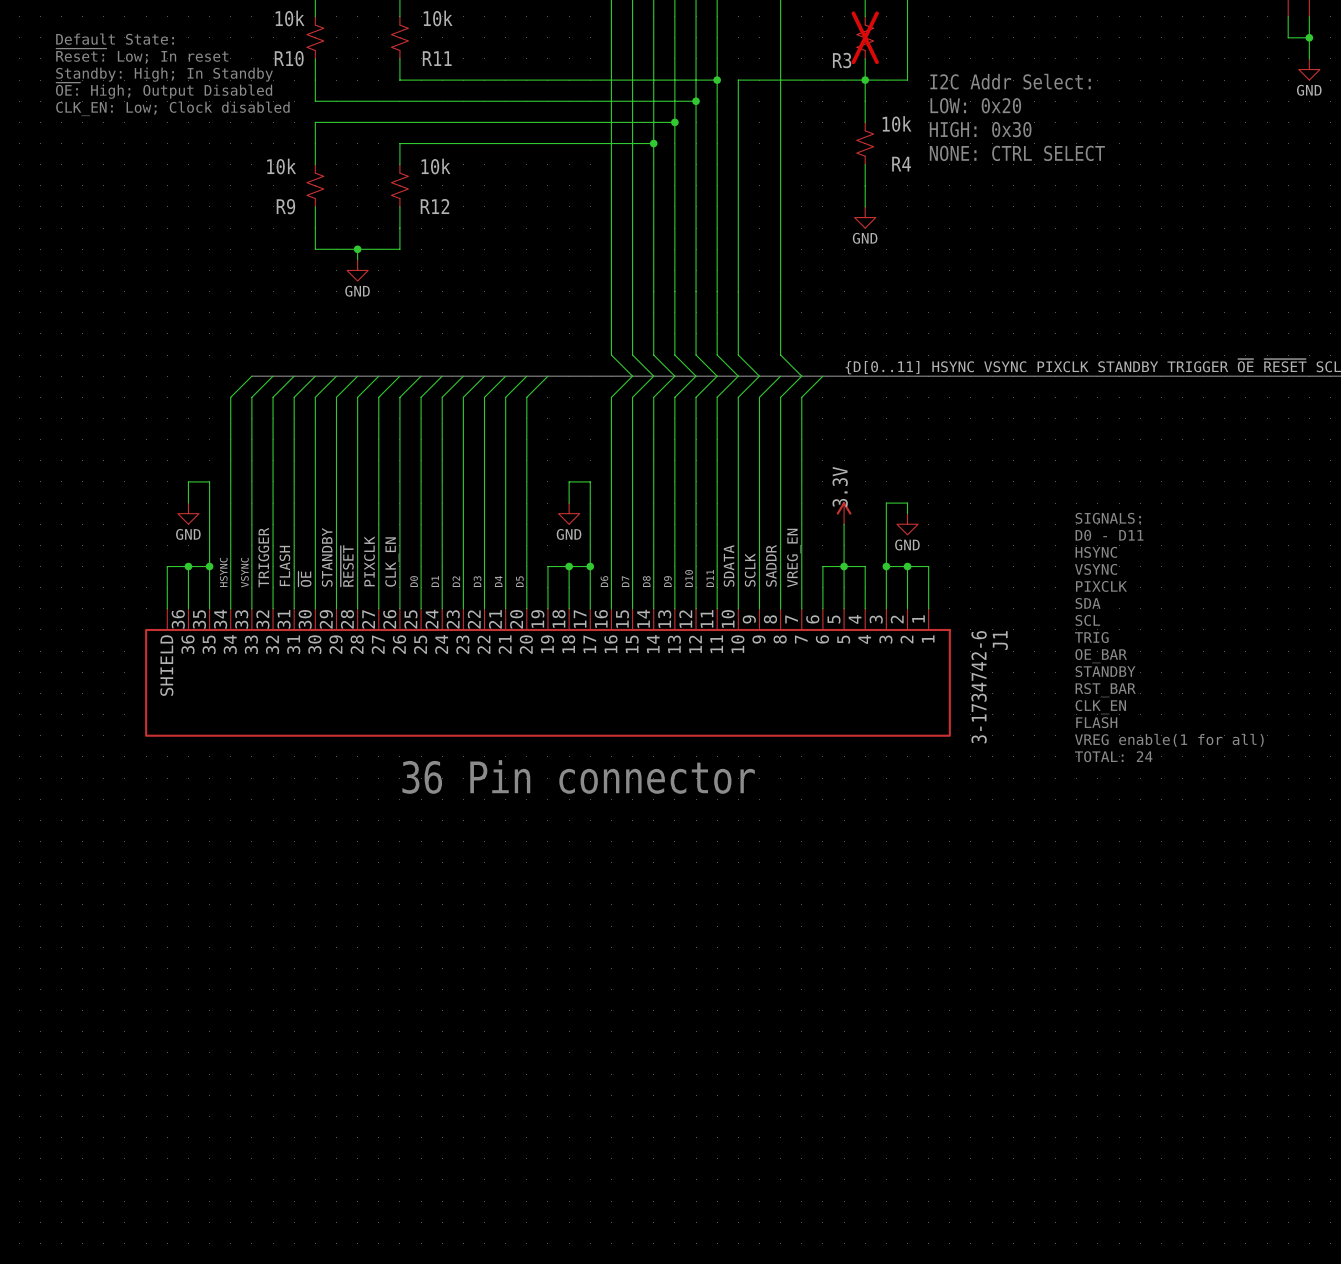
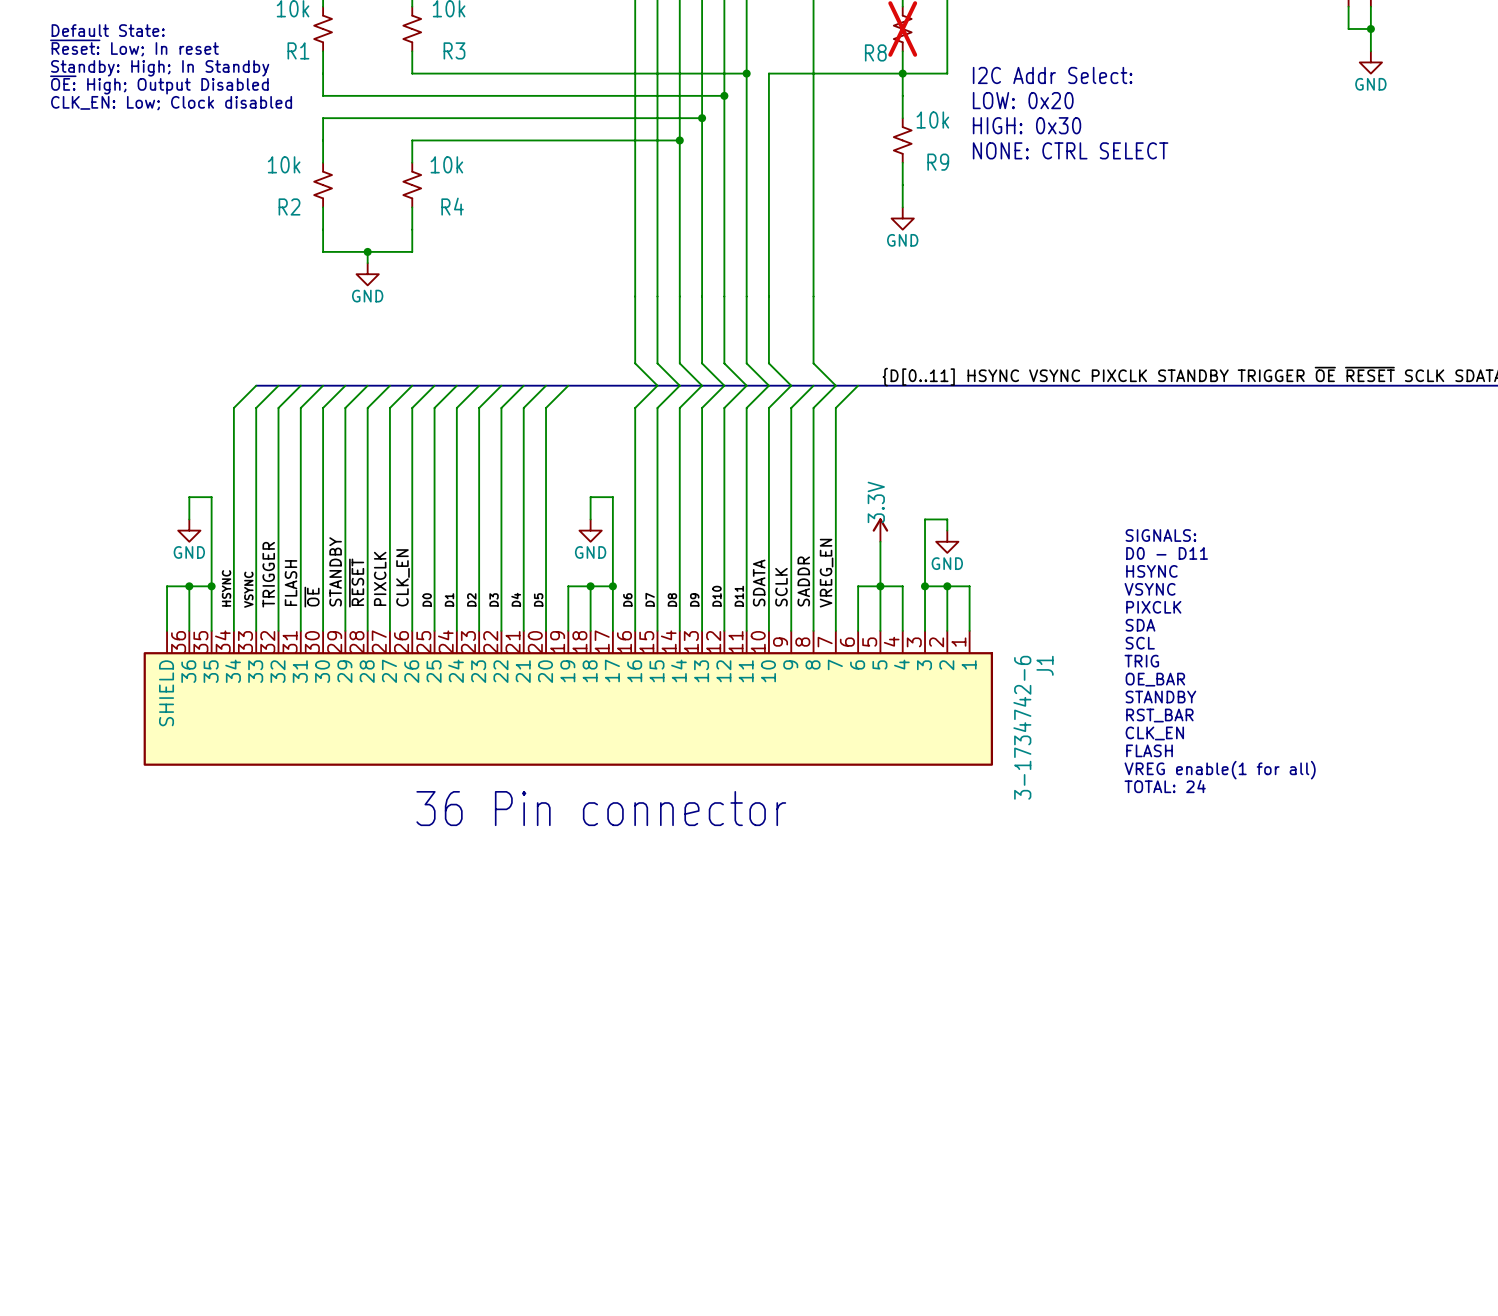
R10 name: R10 (289, 58) -> R1 (298, 50)
R11 name: R11 (437, 58) -> R3 (454, 50)
R3 name: R3 (842, 60) -> R8 (875, 52)
R4 name: R4 (901, 164) -> R9 (938, 162)
R9 name: R9 (285, 206) -> R2 (289, 206)
R12 name: R12 (434, 206) -> R4 (452, 206)

